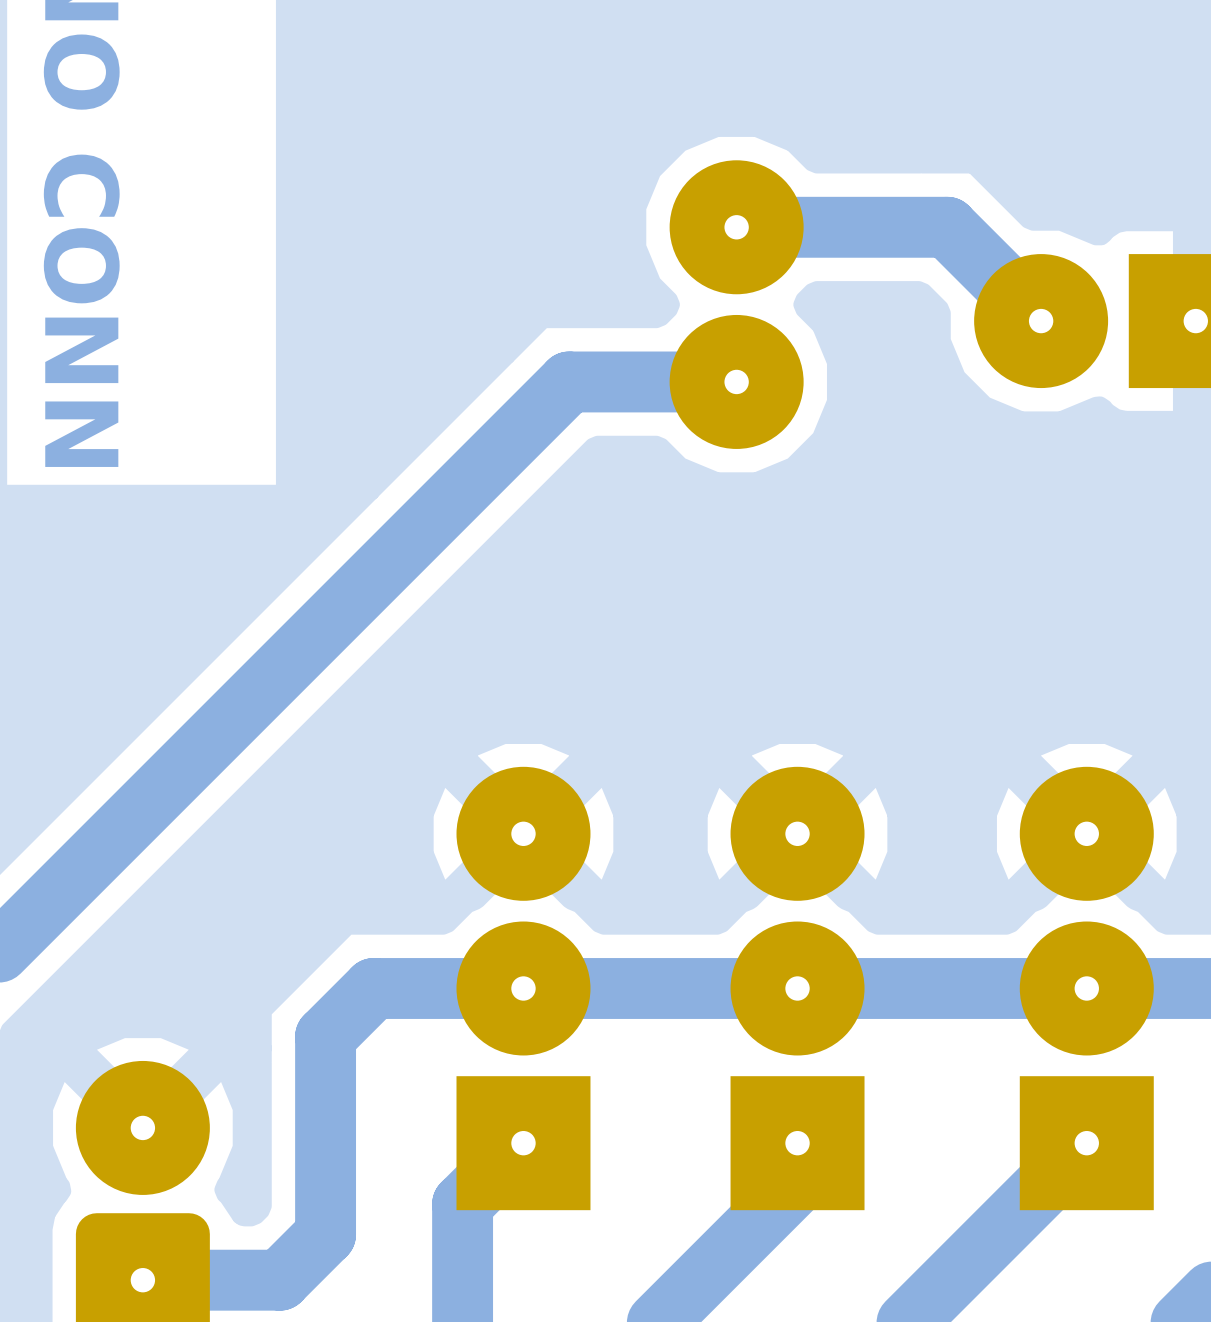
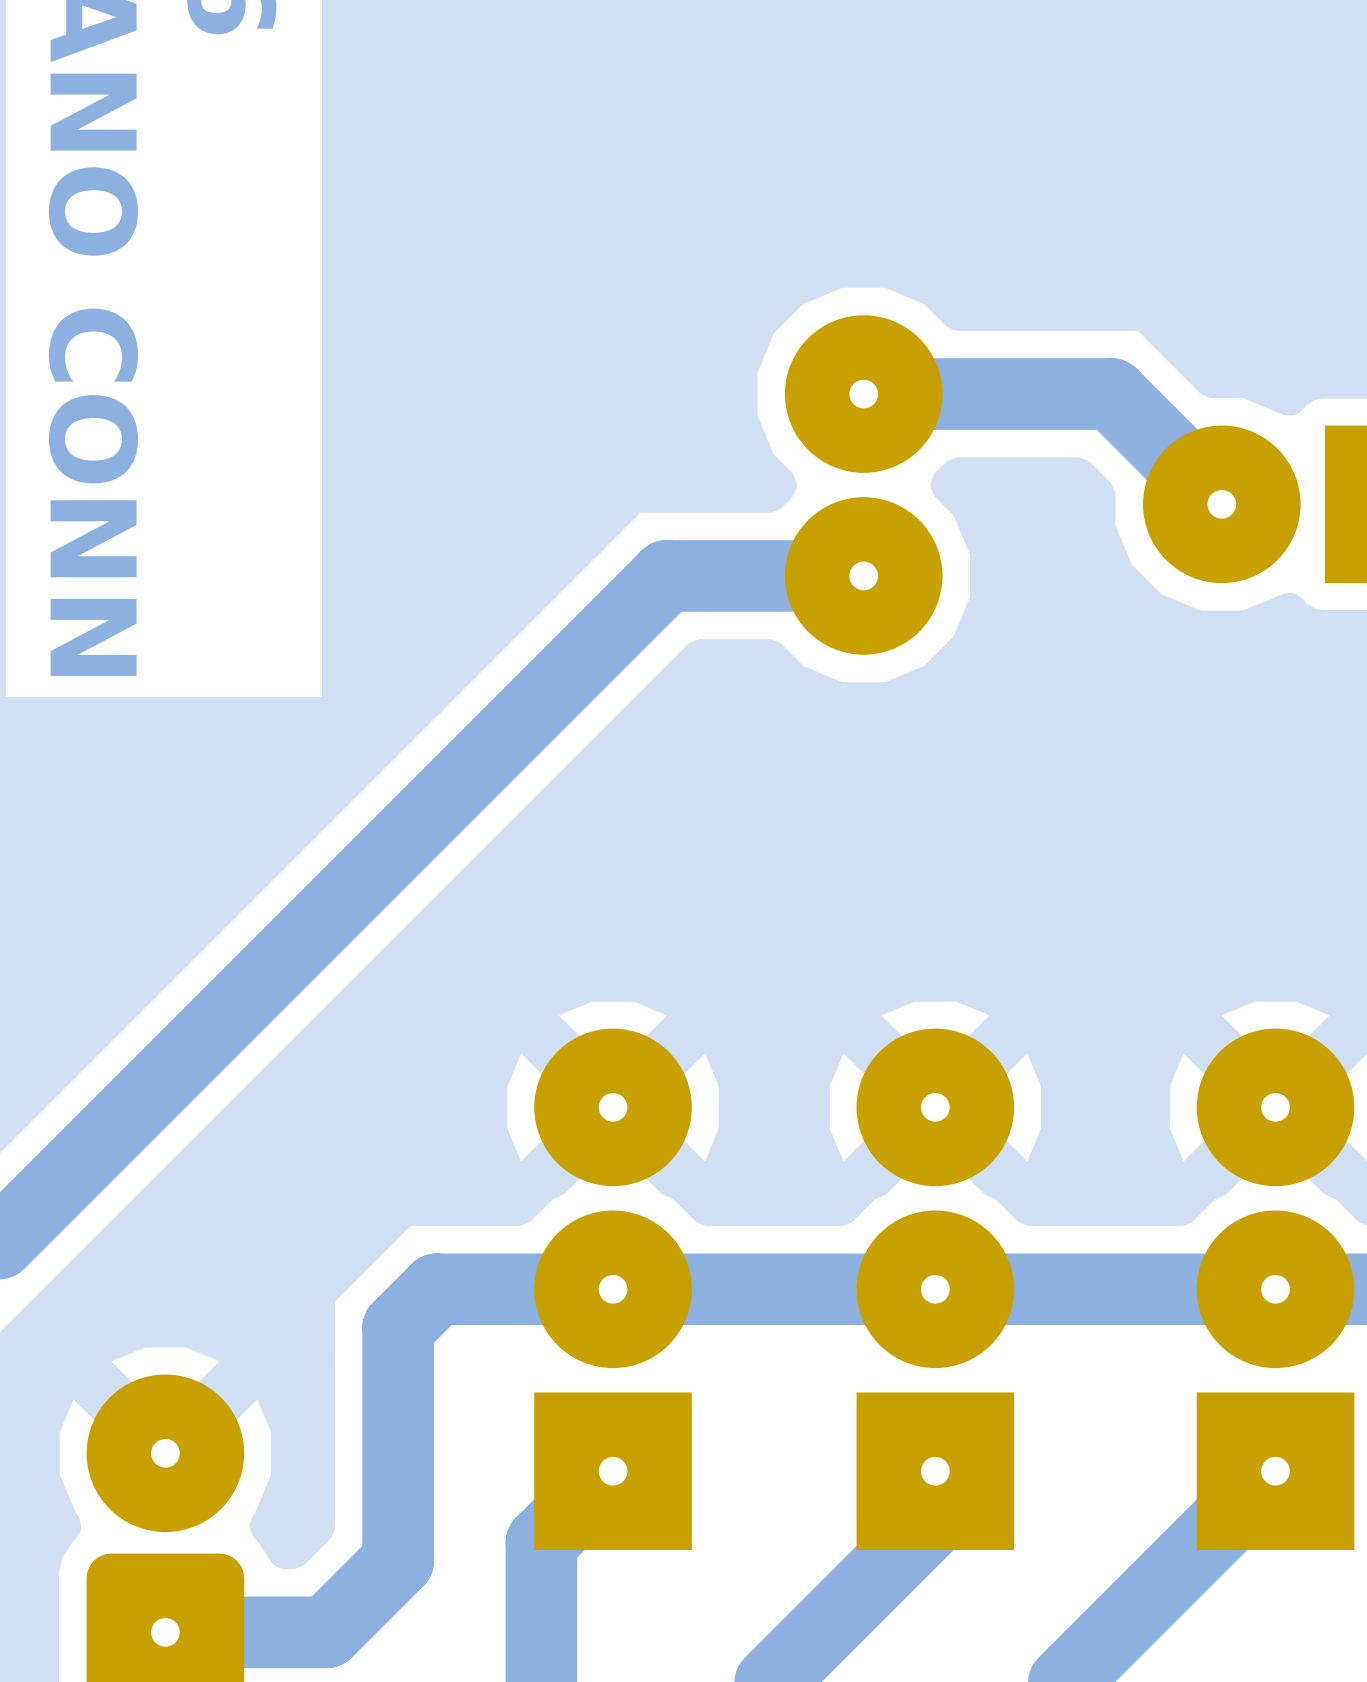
track: (340, 1021) (325, 1036) (325, 1234) -> (398, 1327) (398, 1560) (380, 1578)

